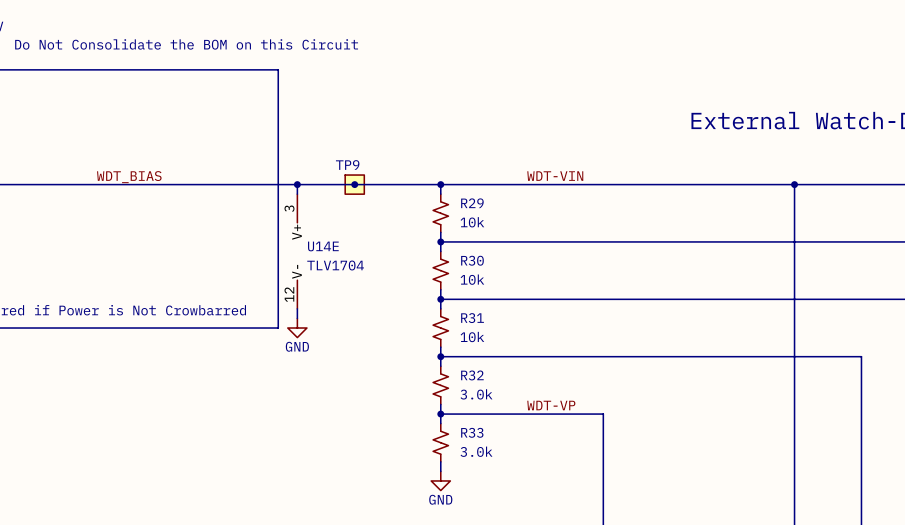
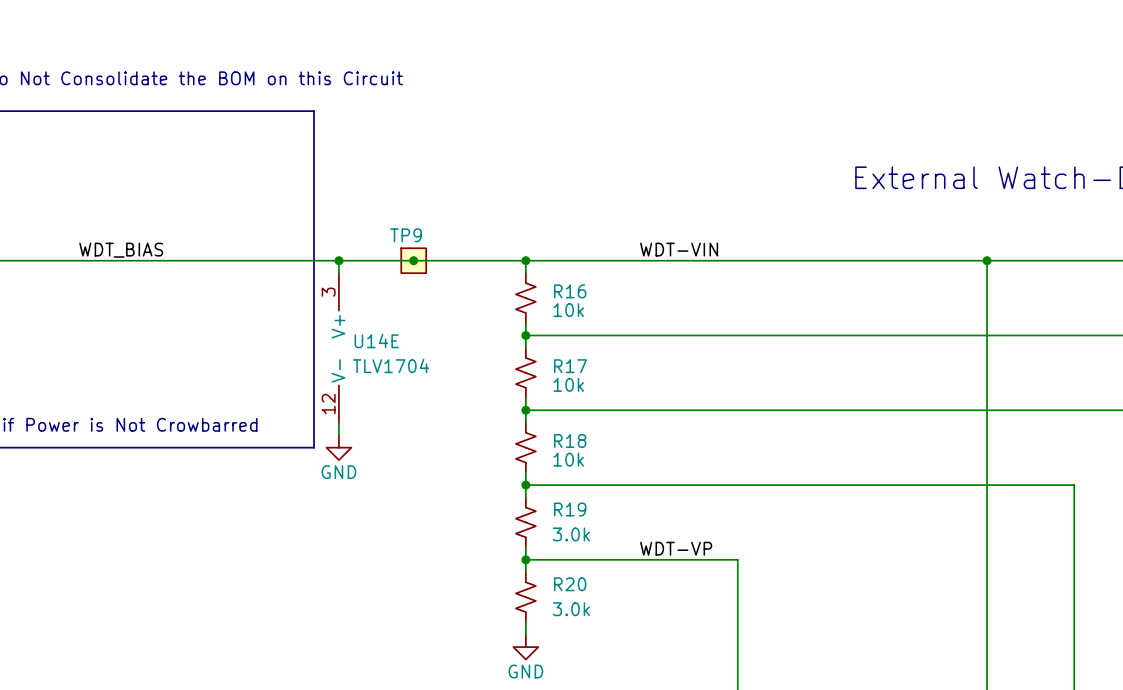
R29 name: R29 (472, 203) -> R16 (570, 291)
R30 name: R30 (472, 260) -> R17 (570, 366)
R31 name: R31 (472, 318) -> R18 (570, 440)
R32 name: R32 (472, 375) -> R19 (570, 509)
R33 name: R33 (472, 432) -> R20 (570, 584)

